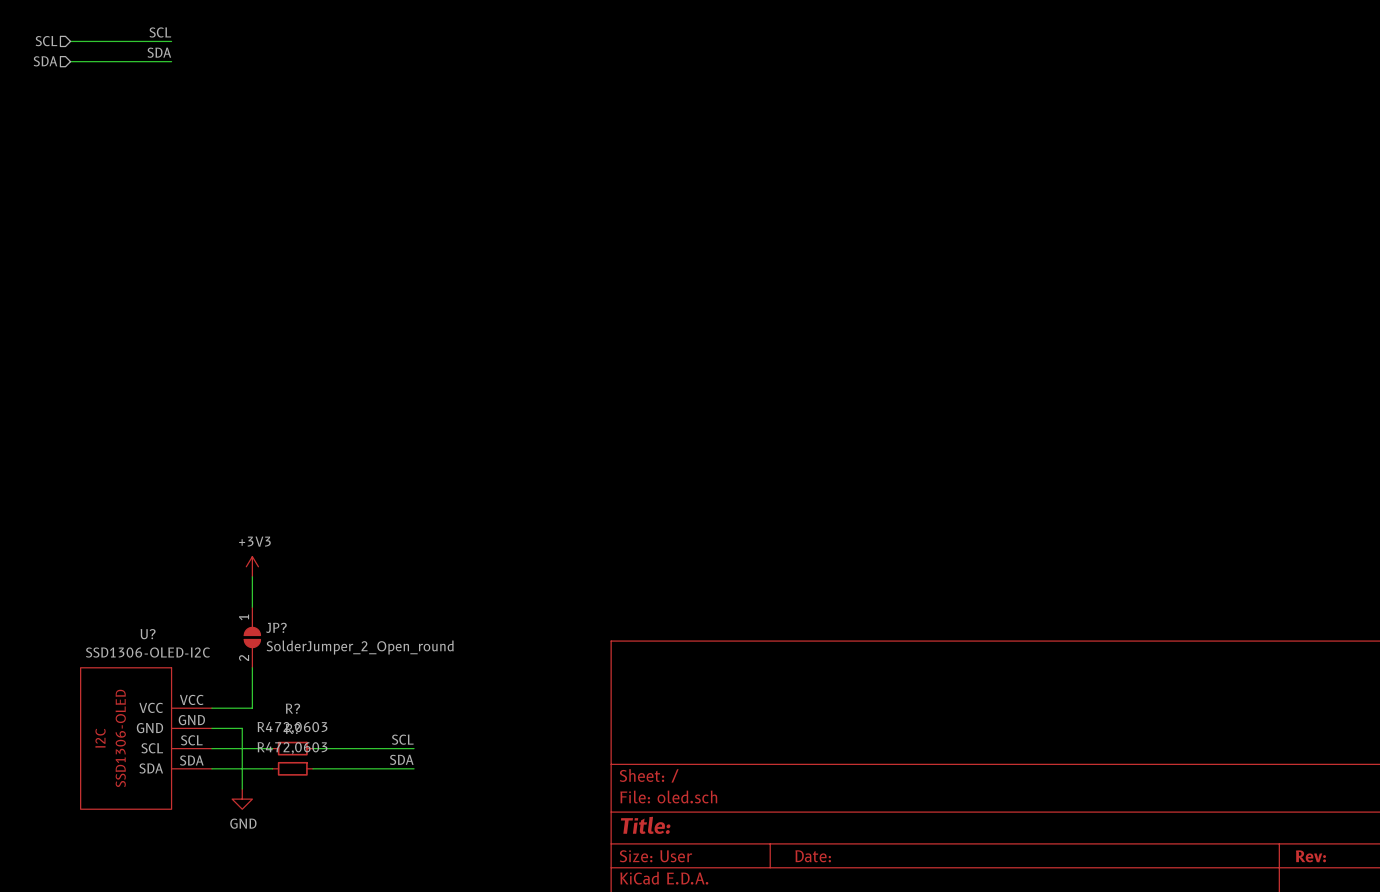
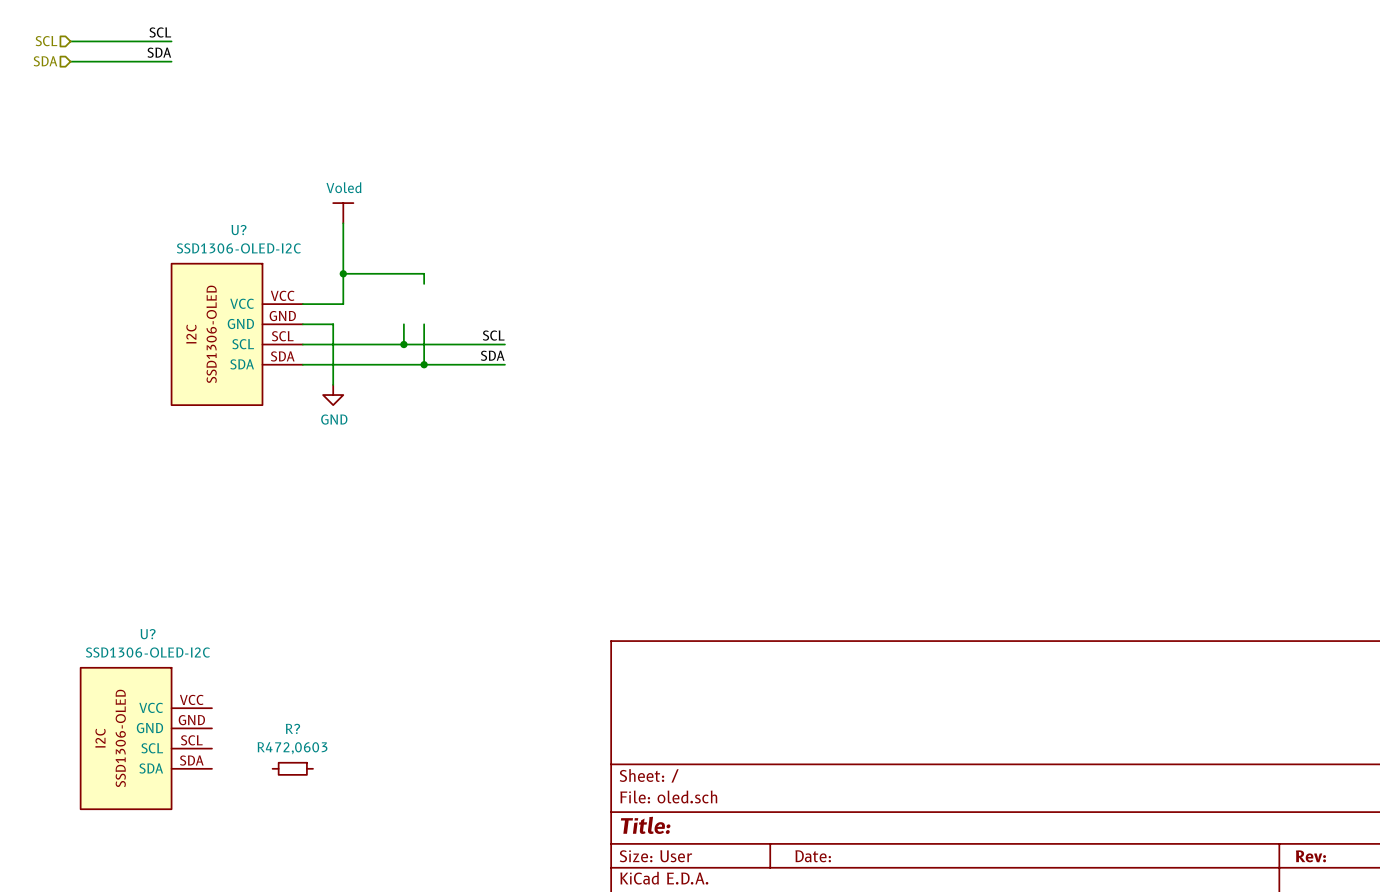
power symbol: none -> Voled (343, 213)
wire: none -> (343, 223) (343, 304) (302, 304)
wire: none -> (343, 273) (424, 273) (424, 283)
junction: none -> (343, 273)
wire: none -> (302, 324) (333, 324) (333, 384)
wire: none -> (403, 324) (403, 344)
wire: none -> (424, 324) (424, 364)
U?: none -> SSD1306-OLED-I2C (237, 334)
label: none -> SCL (493, 335)
wire: none -> (302, 344) (504, 344)
junction: none -> (403, 344)
label: none -> SDA (492, 355)
wire: none -> (302, 364) (504, 364)
junction: none -> (424, 364)
power symbol: none -> GND (333, 395)
power symbol: +3V3 (252, 566) -> none
wire: (252, 576) (252, 607) -> none
JP?: SolderJumper_2_Open_round (252, 637) -> none
wire: (252, 667) (252, 708) (211, 708) -> none
wire: (211, 728) (242, 728) (242, 789) -> none
label: SCL (402, 739) -> none
wire: (211, 748) (272, 748) -> none
R?: R472,0603 (292, 748) -> none
wire: (312, 748) (414, 748) -> none
label: SDA (401, 759) -> none
wire: (211, 768) (272, 768) -> none
wire: (312, 768) (414, 768) -> none
power symbol: GND (242, 799) -> none

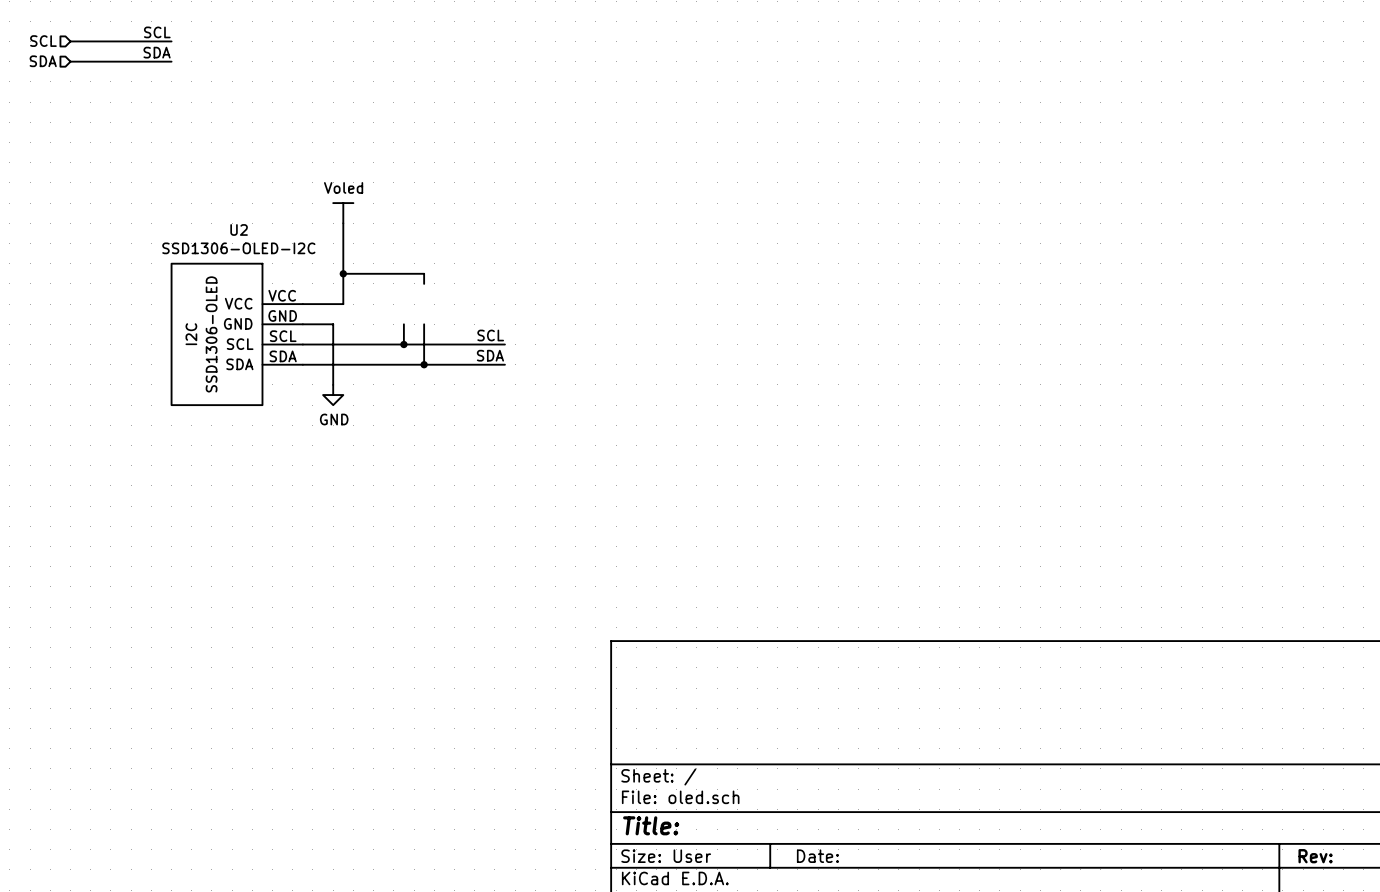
U? name: U? (239, 230) -> U2 (239, 229)
U?: SSD1306-OLED-I2C (146, 738) -> none
R?: R472,0603 (292, 768) -> none

